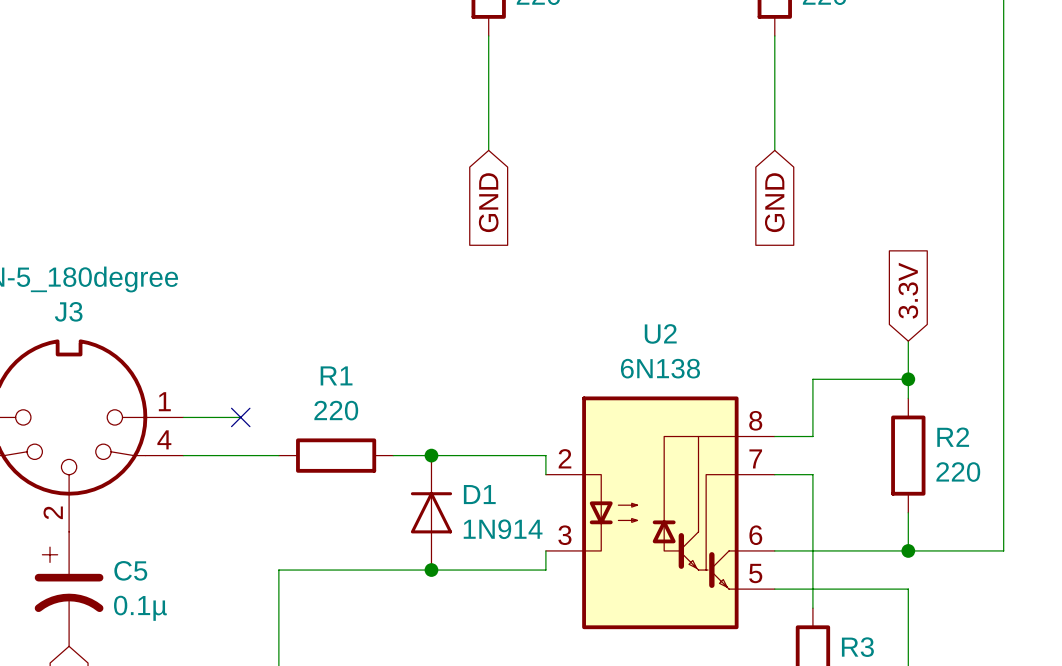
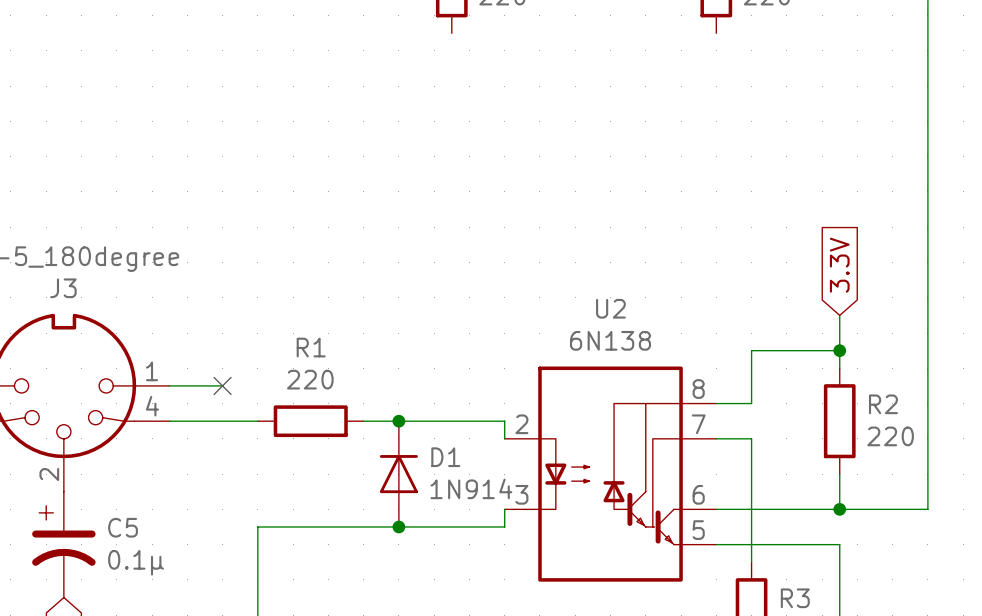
wire: (488, 35) (488, 150) -> none
wire: (774, 35) (774, 150) -> none
global label: GND (488, 202) -> none
global label: GND (774, 202) -> none

